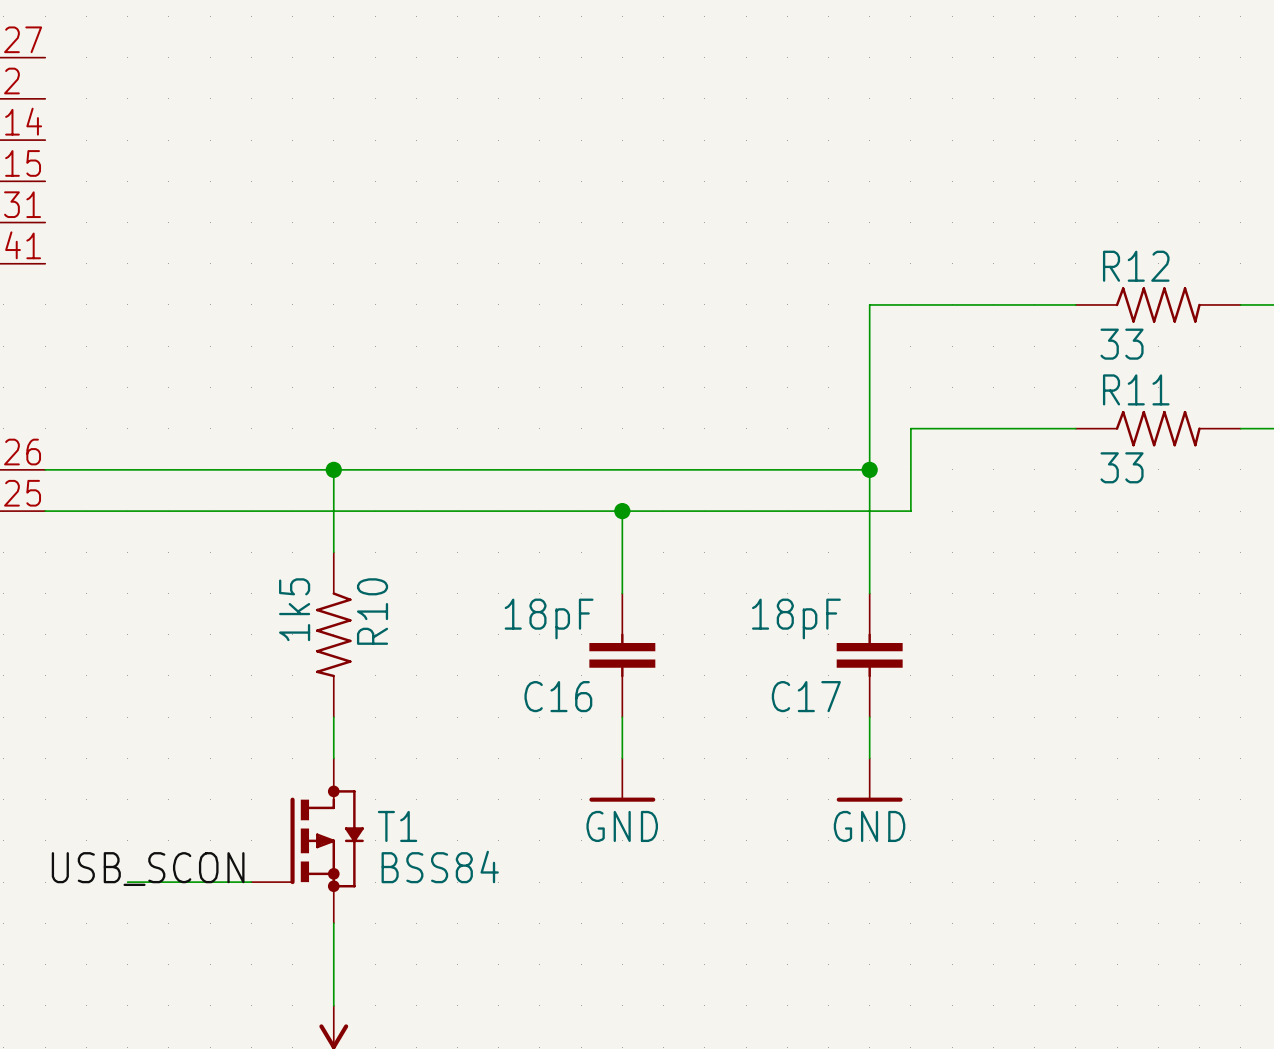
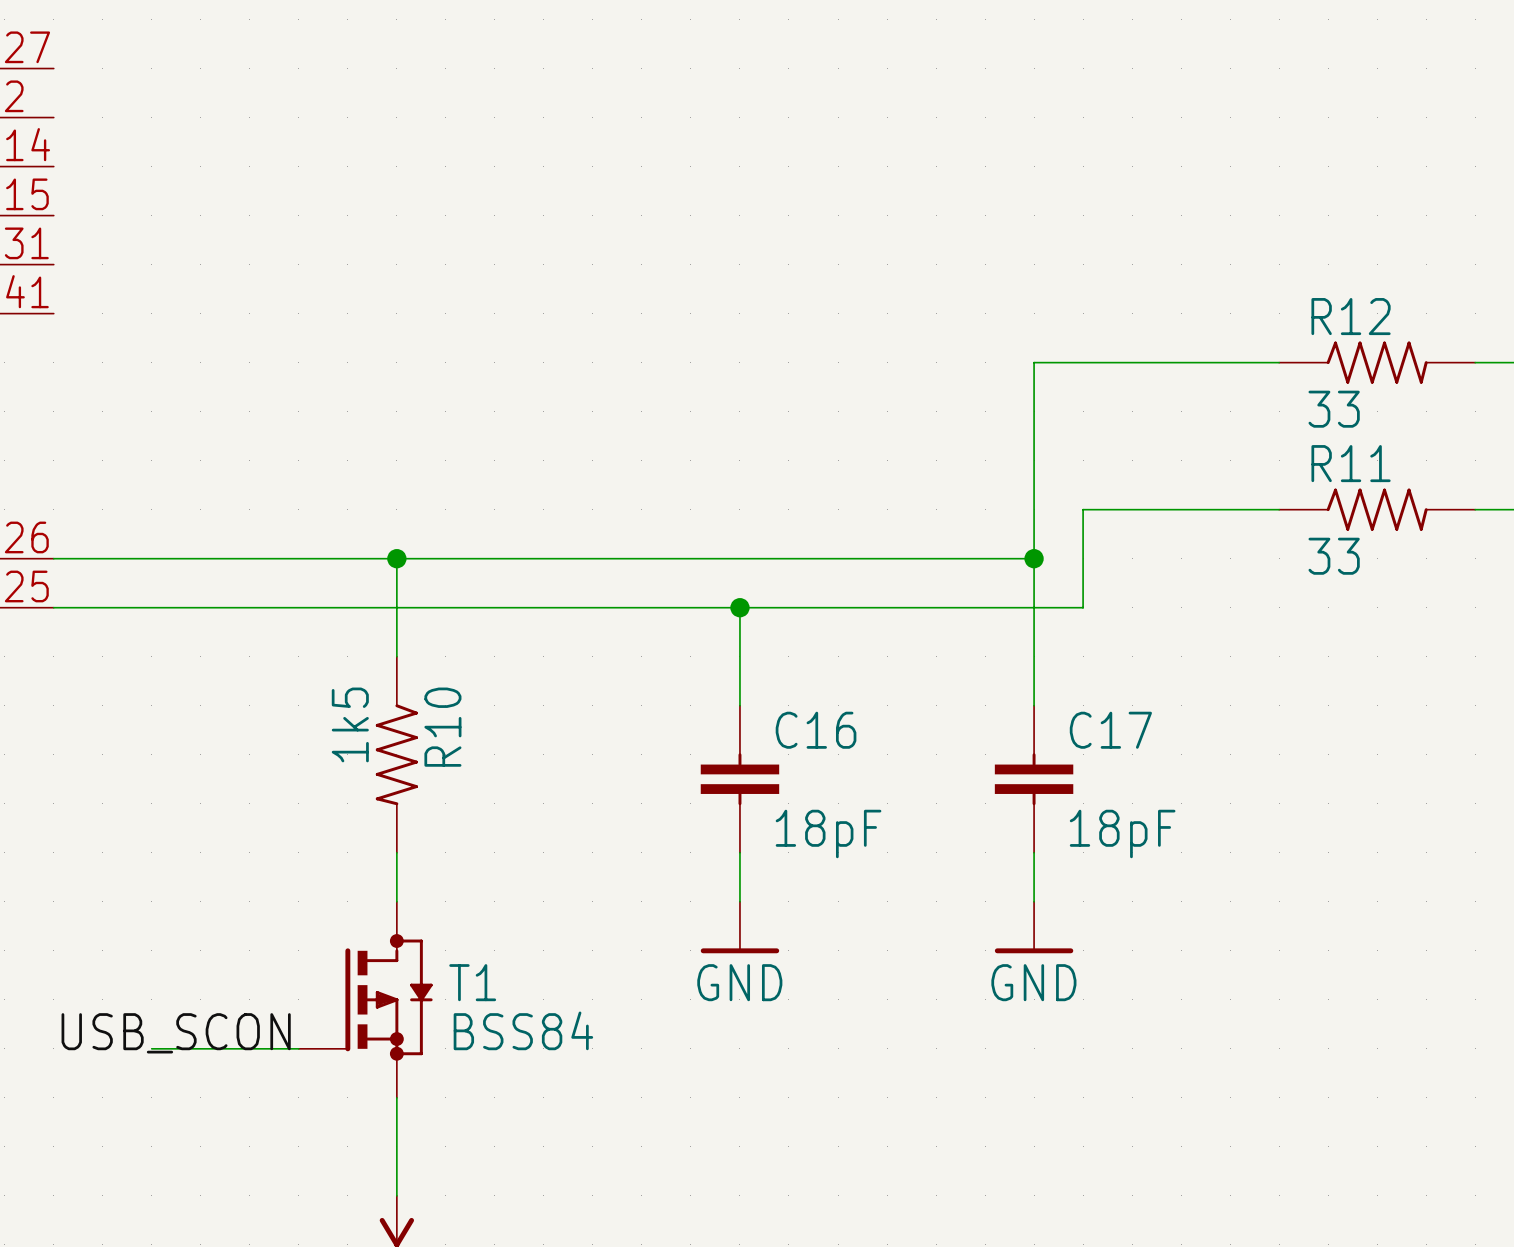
C16 value position: 18pF (549, 618) -> 18pF (828, 833)
C17 value position: 18pF (796, 618) -> 18pF (1122, 833)
C16 name position: C16 (558, 696) -> C16 (816, 730)
C17 name position: C17 (806, 696) -> C17 (1110, 730)

